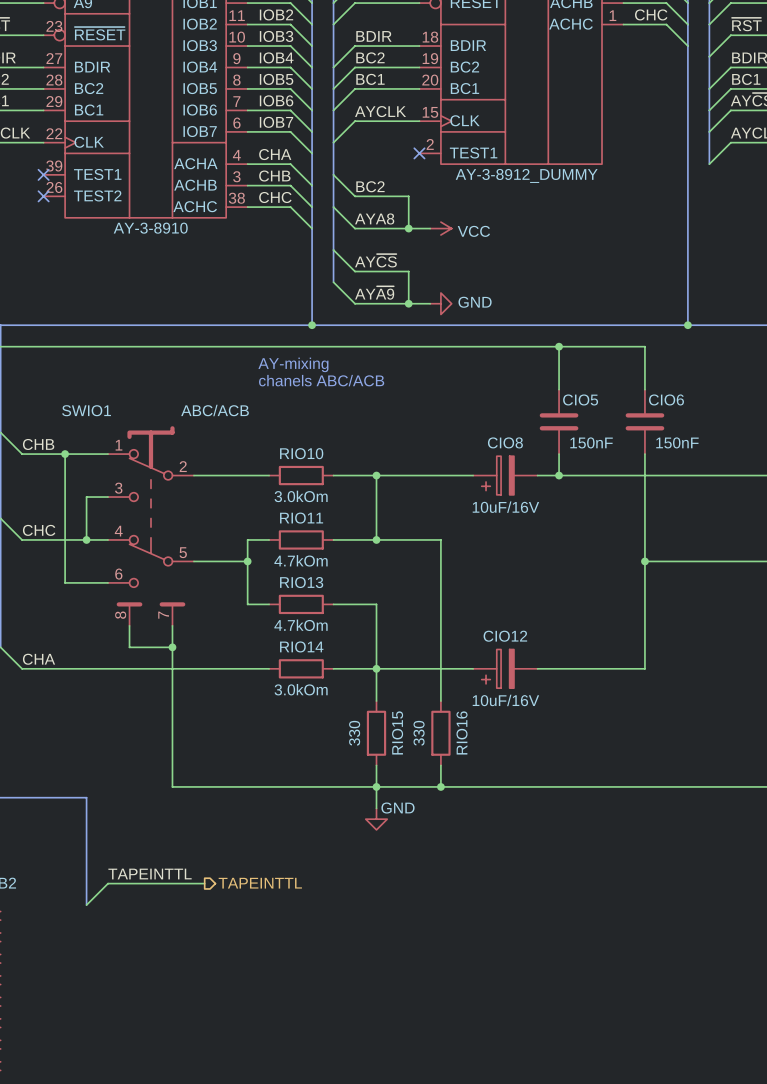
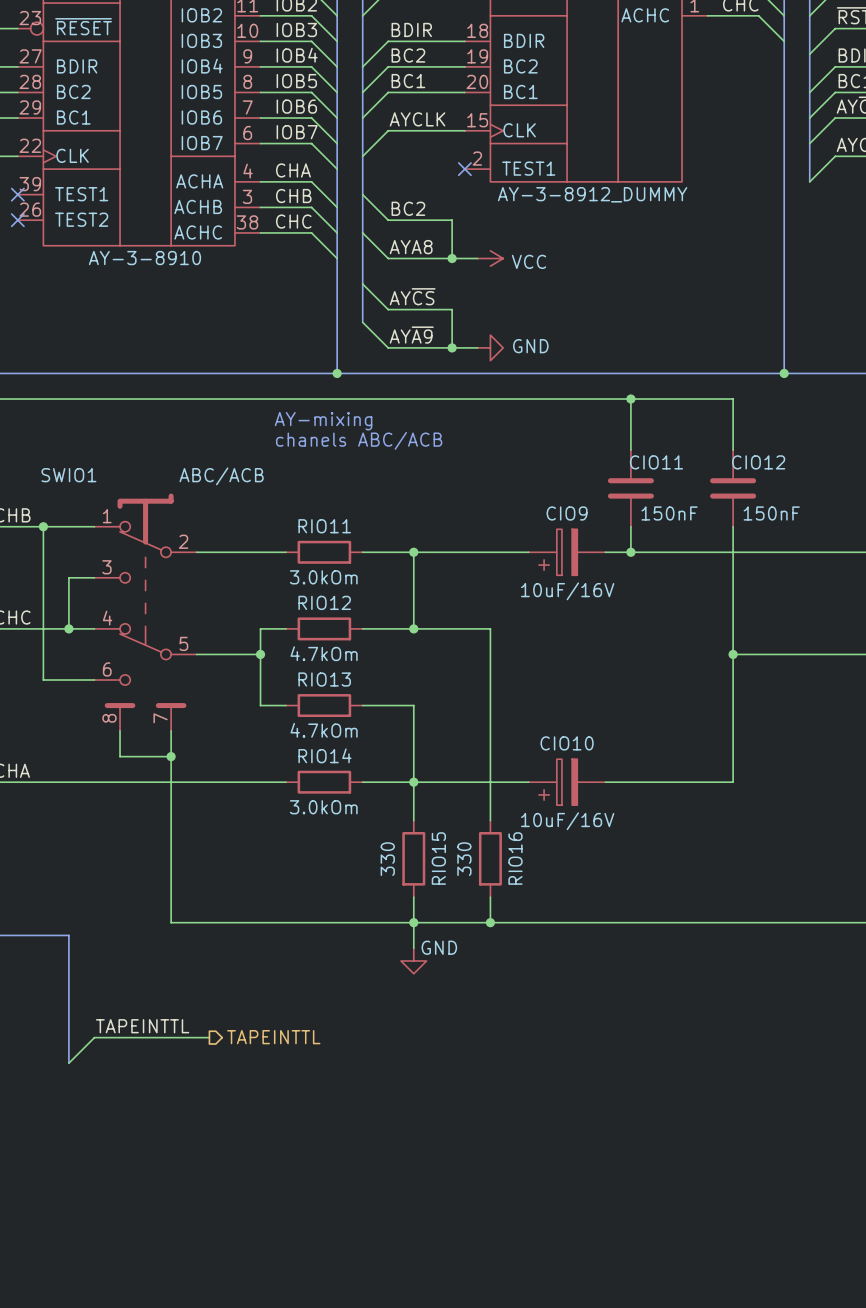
CIO5 name: CIO5 (580, 399) -> CIO11 (656, 462)
CIO6 name: CIO6 (666, 399) -> CIO12 (758, 462)
CIO8 name: CIO8 (505, 442) -> CIO9 (567, 513)
RIO10 name: RIO10 (301, 453) -> RIO11 (324, 526)
RIO11 name: RIO11 (301, 518) -> RIO12 (324, 602)
CIO12 name: CIO12 (505, 636) -> CIO10 (567, 743)

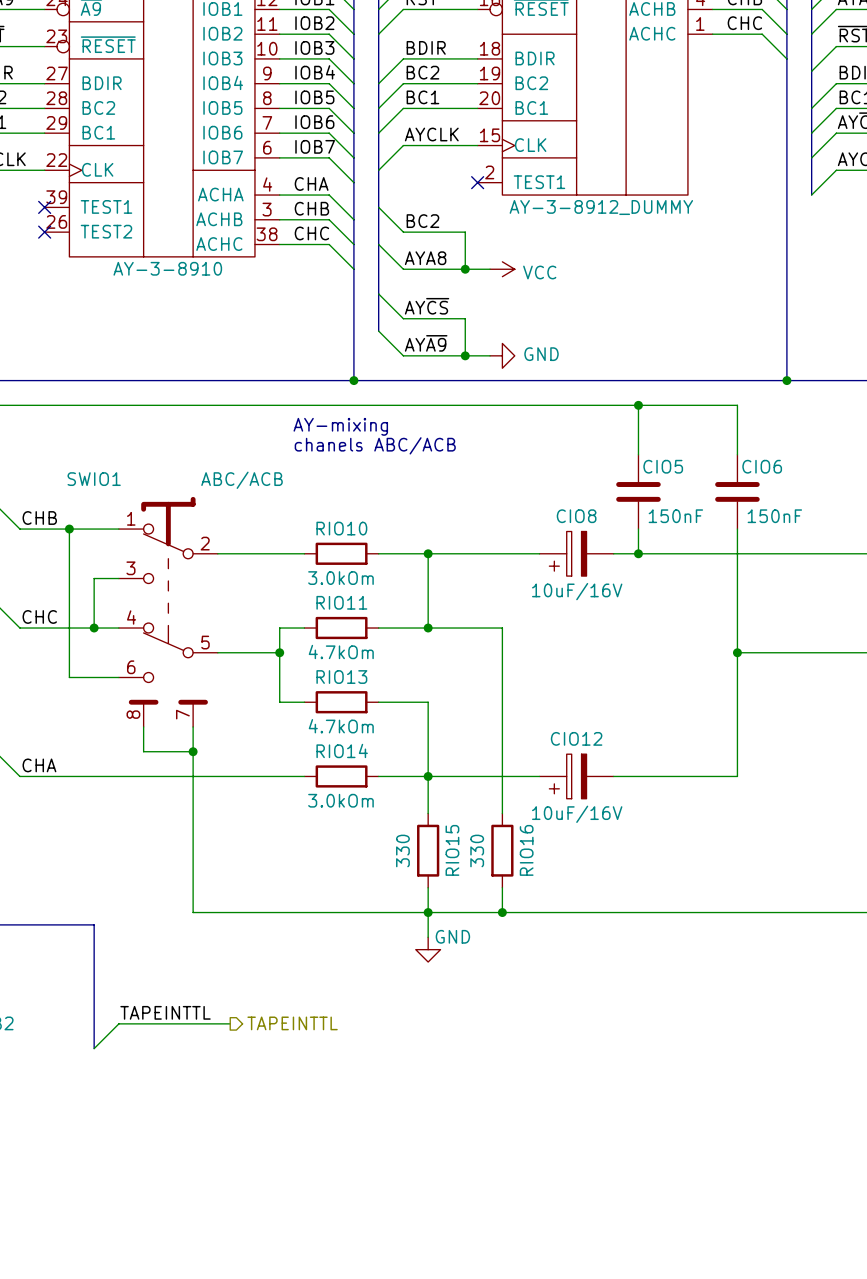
CIO11 name: CIO11 (656, 462) -> CIO5 (663, 466)
CIO12 name: CIO12 (758, 462) -> CIO6 (762, 466)
CIO9 name: CIO9 (567, 513) -> CIO8 (576, 516)
RIO11 name: RIO11 (324, 526) -> RIO10 (341, 528)
RIO12 name: RIO12 (324, 602) -> RIO11 (341, 602)
CIO10 name: CIO10 (567, 743) -> CIO12 (576, 738)

